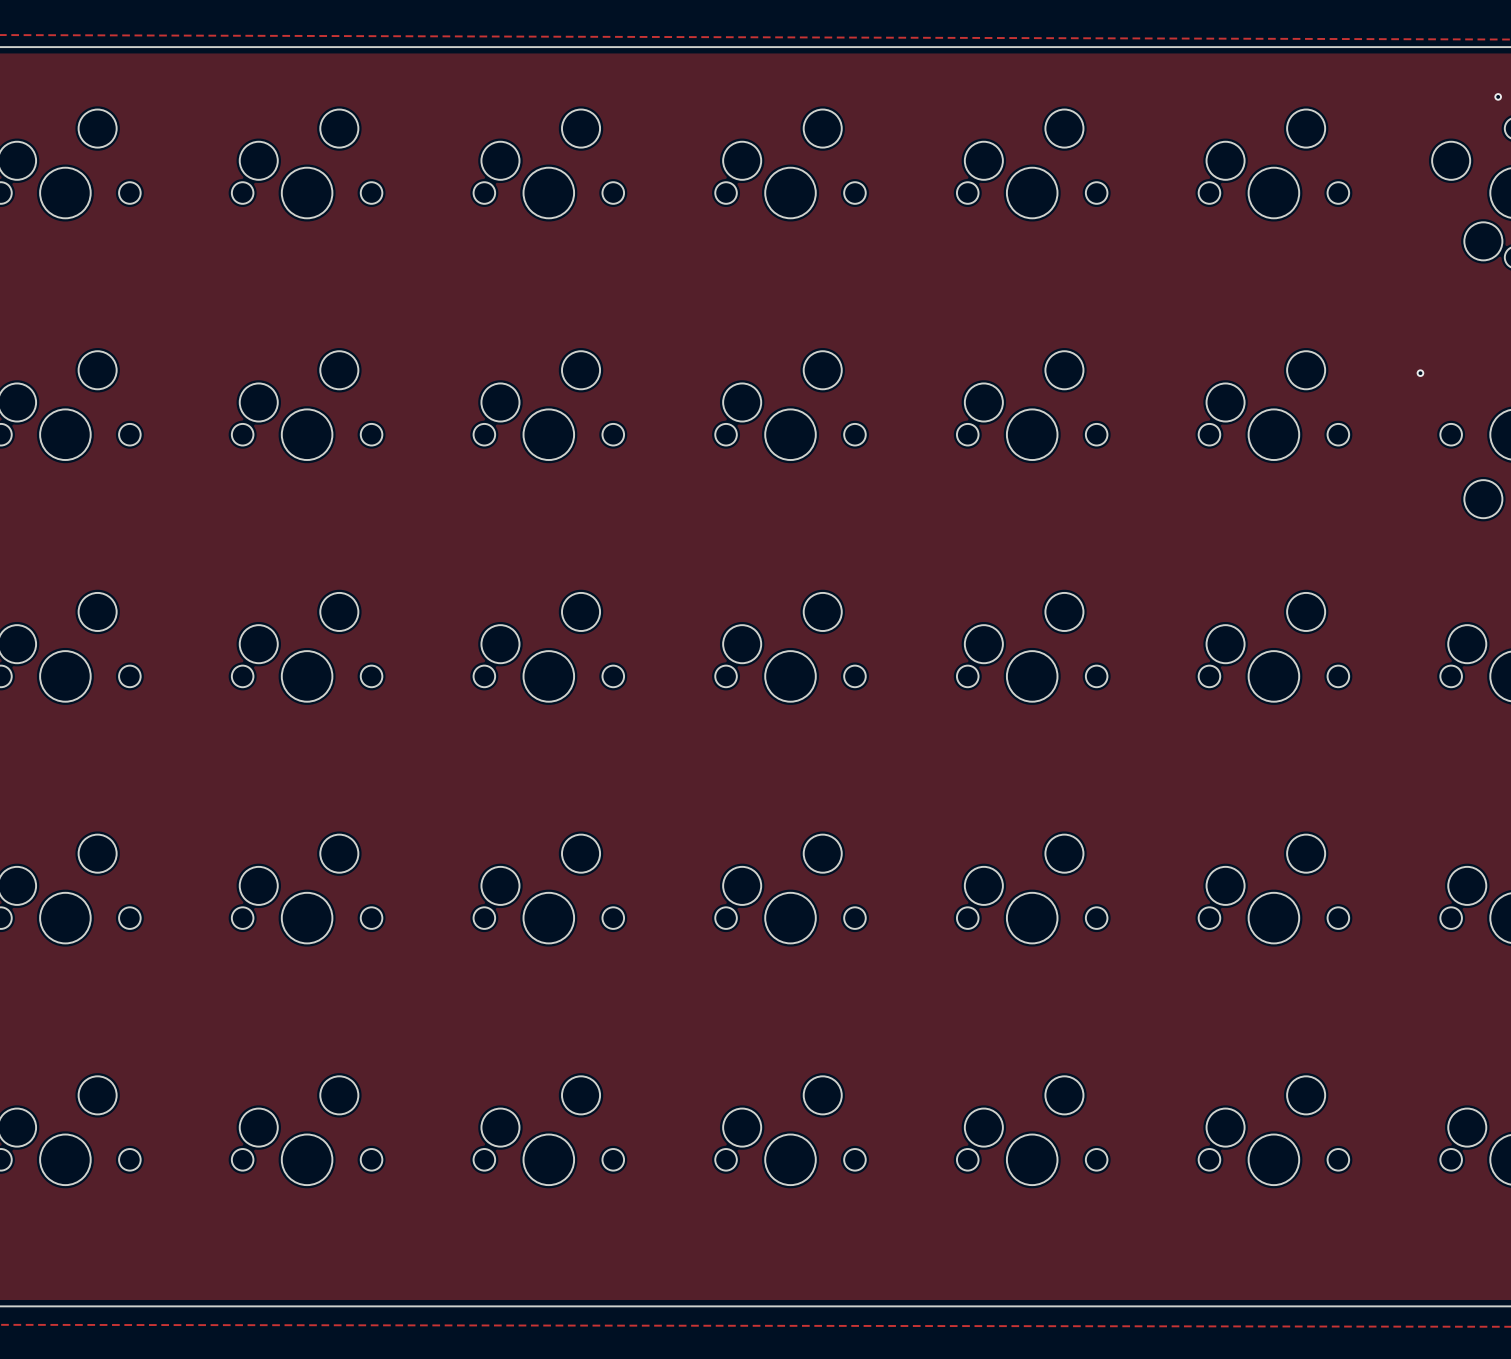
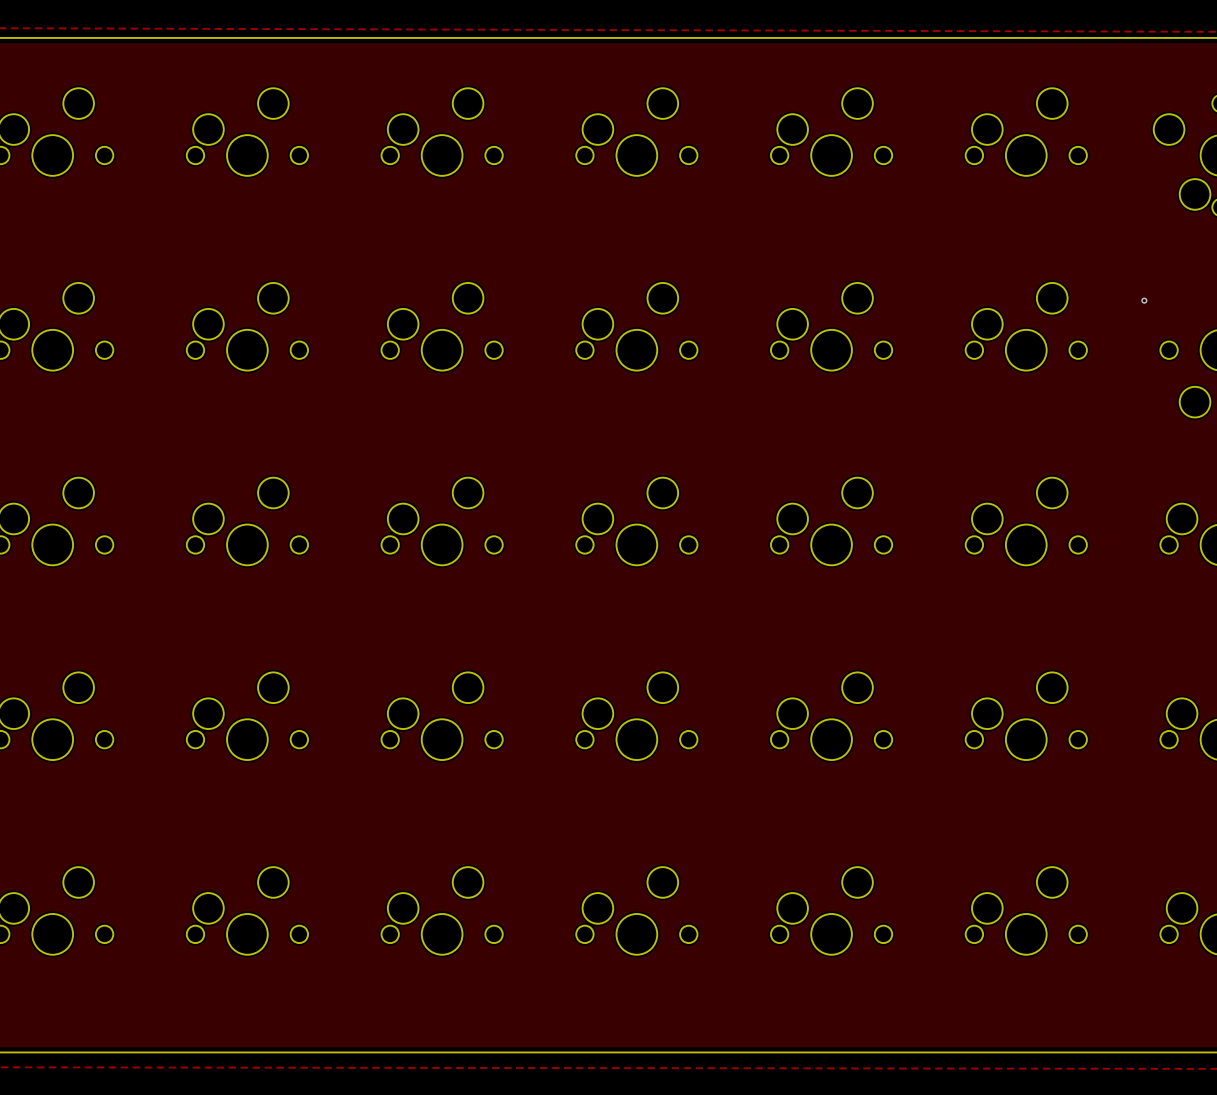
via: (1498, 96) -> none

